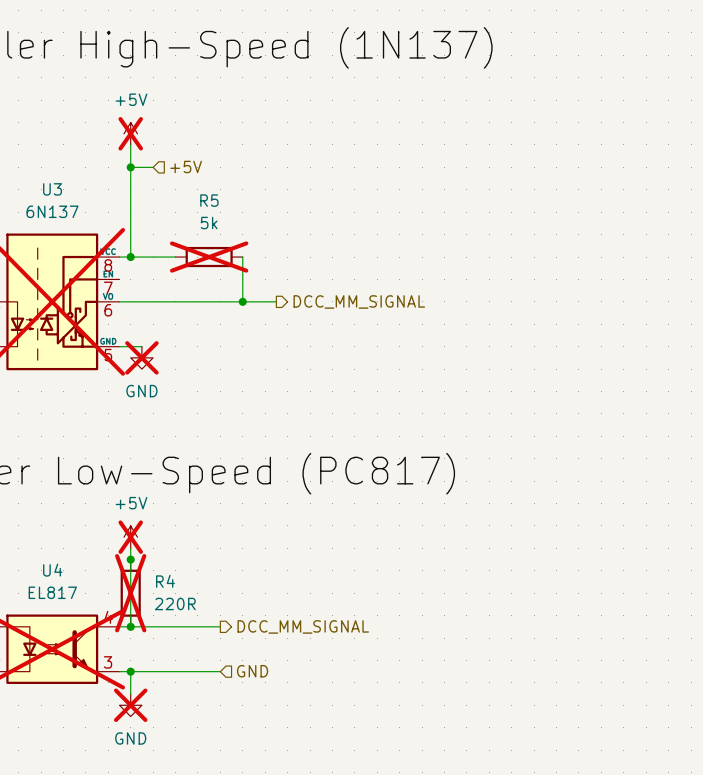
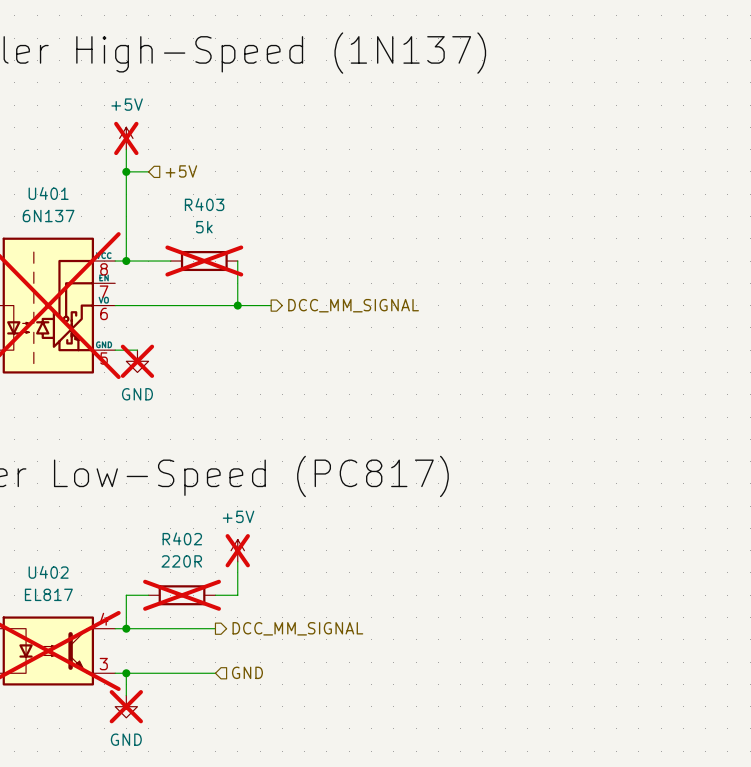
U3 name: U3 (52, 189) -> U401 (48, 193)
R5 name: R5 (209, 200) -> R403 (204, 204)
power symbol position: +5V (130, 537) -> +5V (237, 550)
wire: (130, 548) (130, 593) -> (148, 595) (126, 595)
junction: (130, 559) -> none
wire: none -> (237, 561) (237, 595) (215, 595)
U4 name: U4 (52, 570) -> U402 (48, 572)
R4: 220R (130, 593) -> none
R402: none -> 220R (182, 595)

